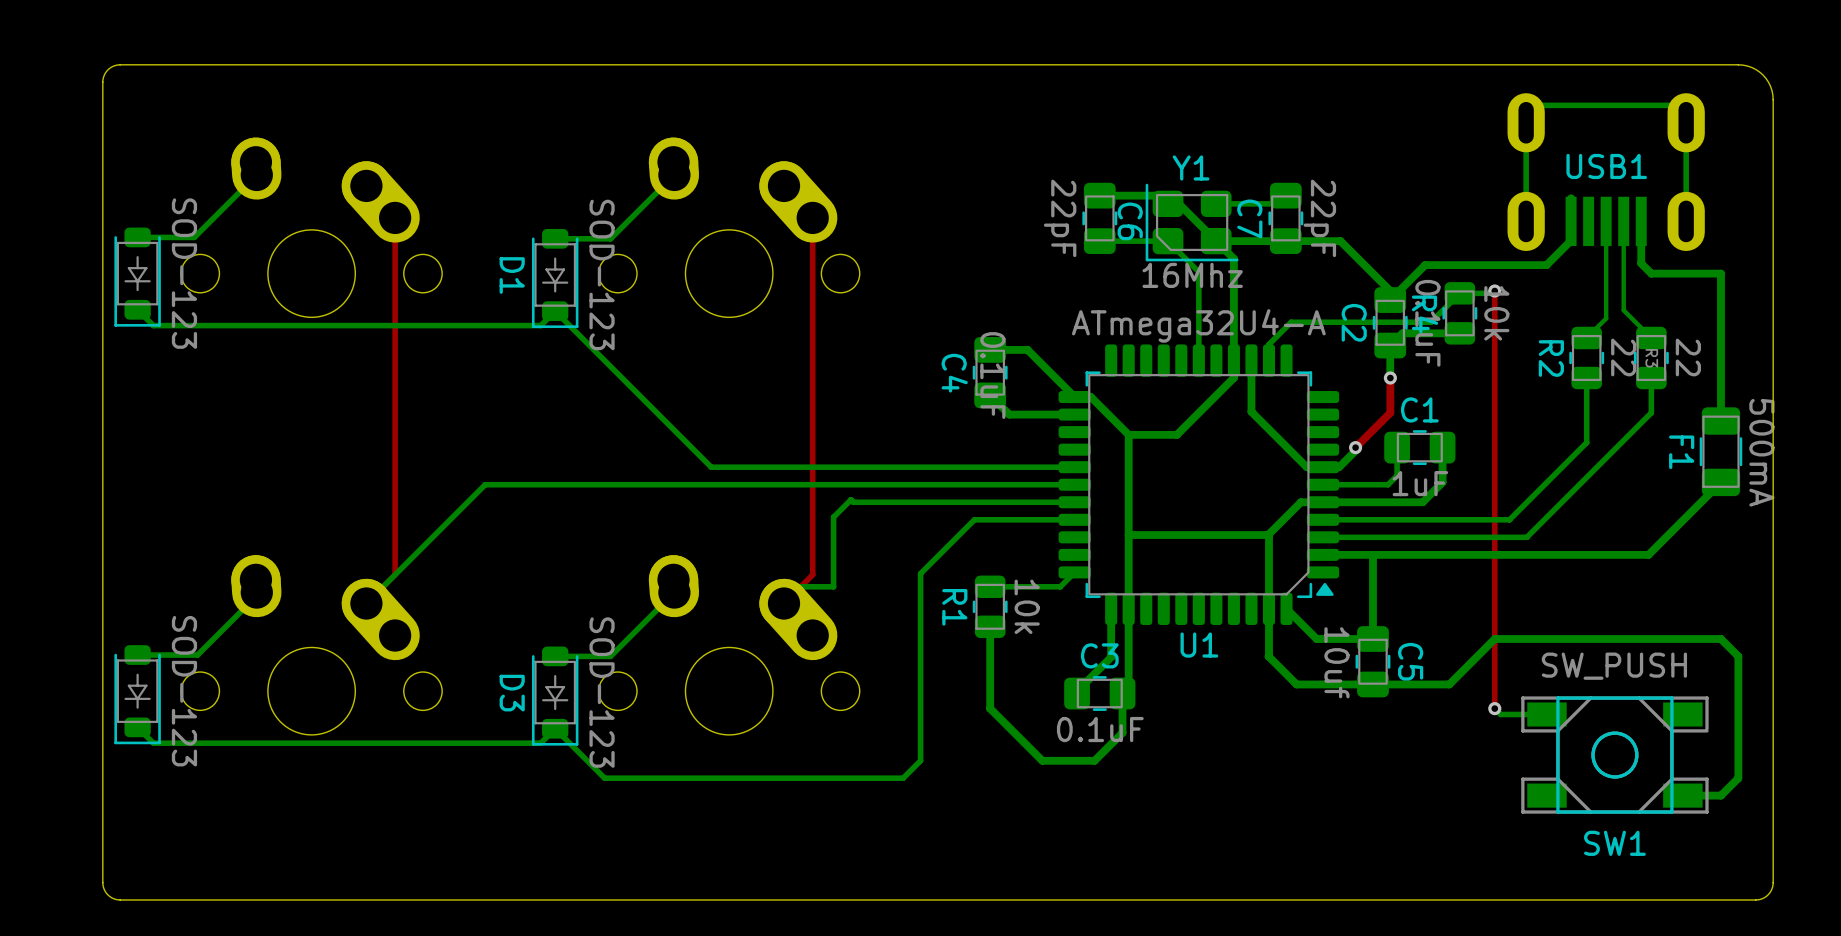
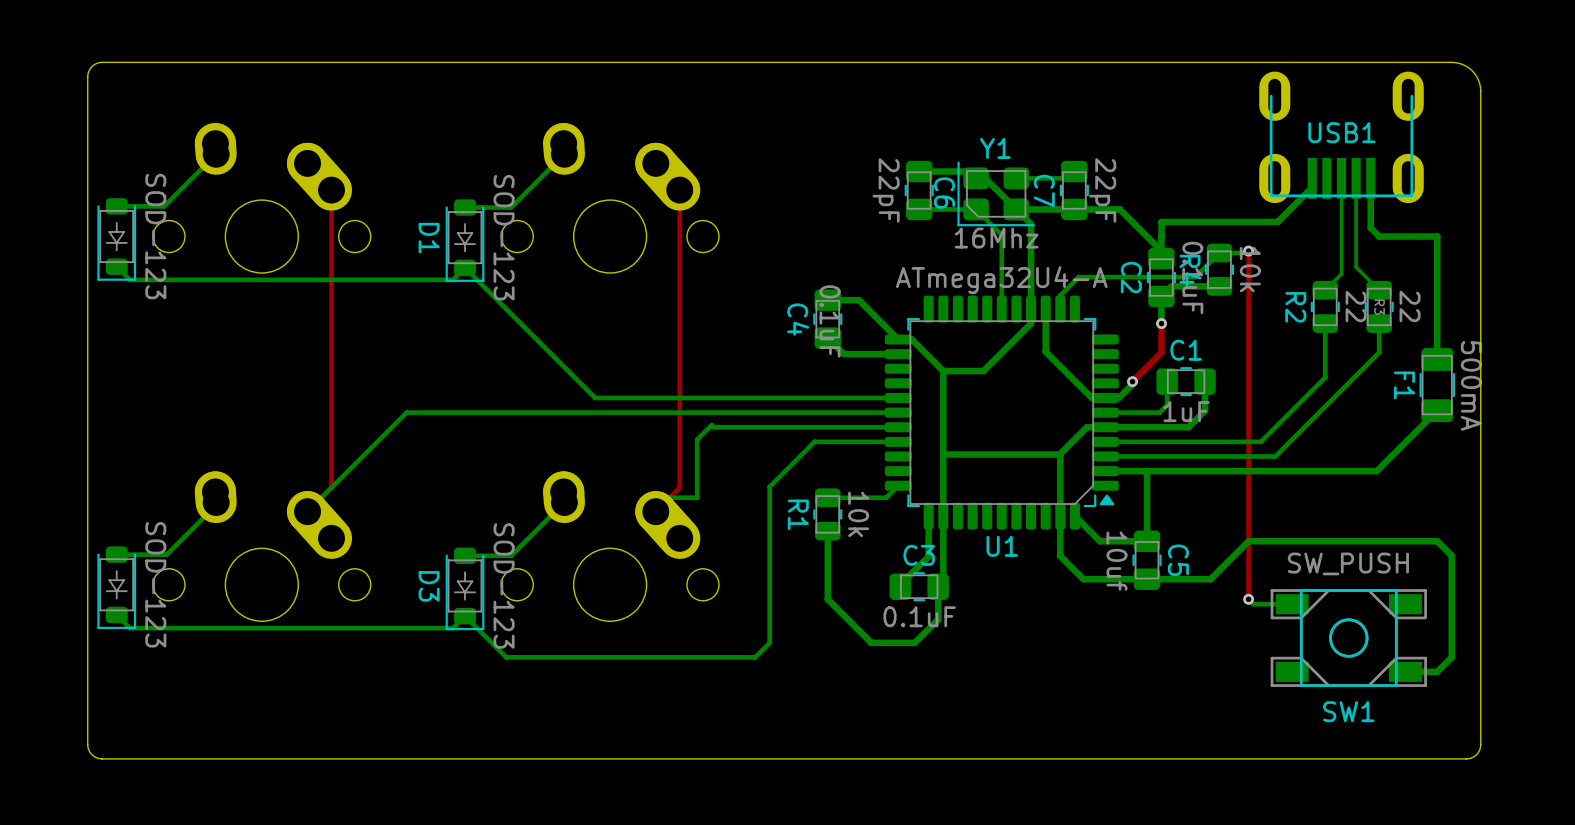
USB1 footprint: [1507, 93, 1705, 252] -> [1259, 71, 1424, 204]
bottom track: (1686, 204) (1686, 105) (1526, 105) (1526, 204) -> none
bottom track: none -> (1312, 187) (1277, 222) (1161, 222) (1161, 236)
bottom track: (1571, 221) (1571, 240) (1546, 265) (1425, 265) (1390, 300) -> none
bottom track: none -> (1161, 236) (1161, 250)

